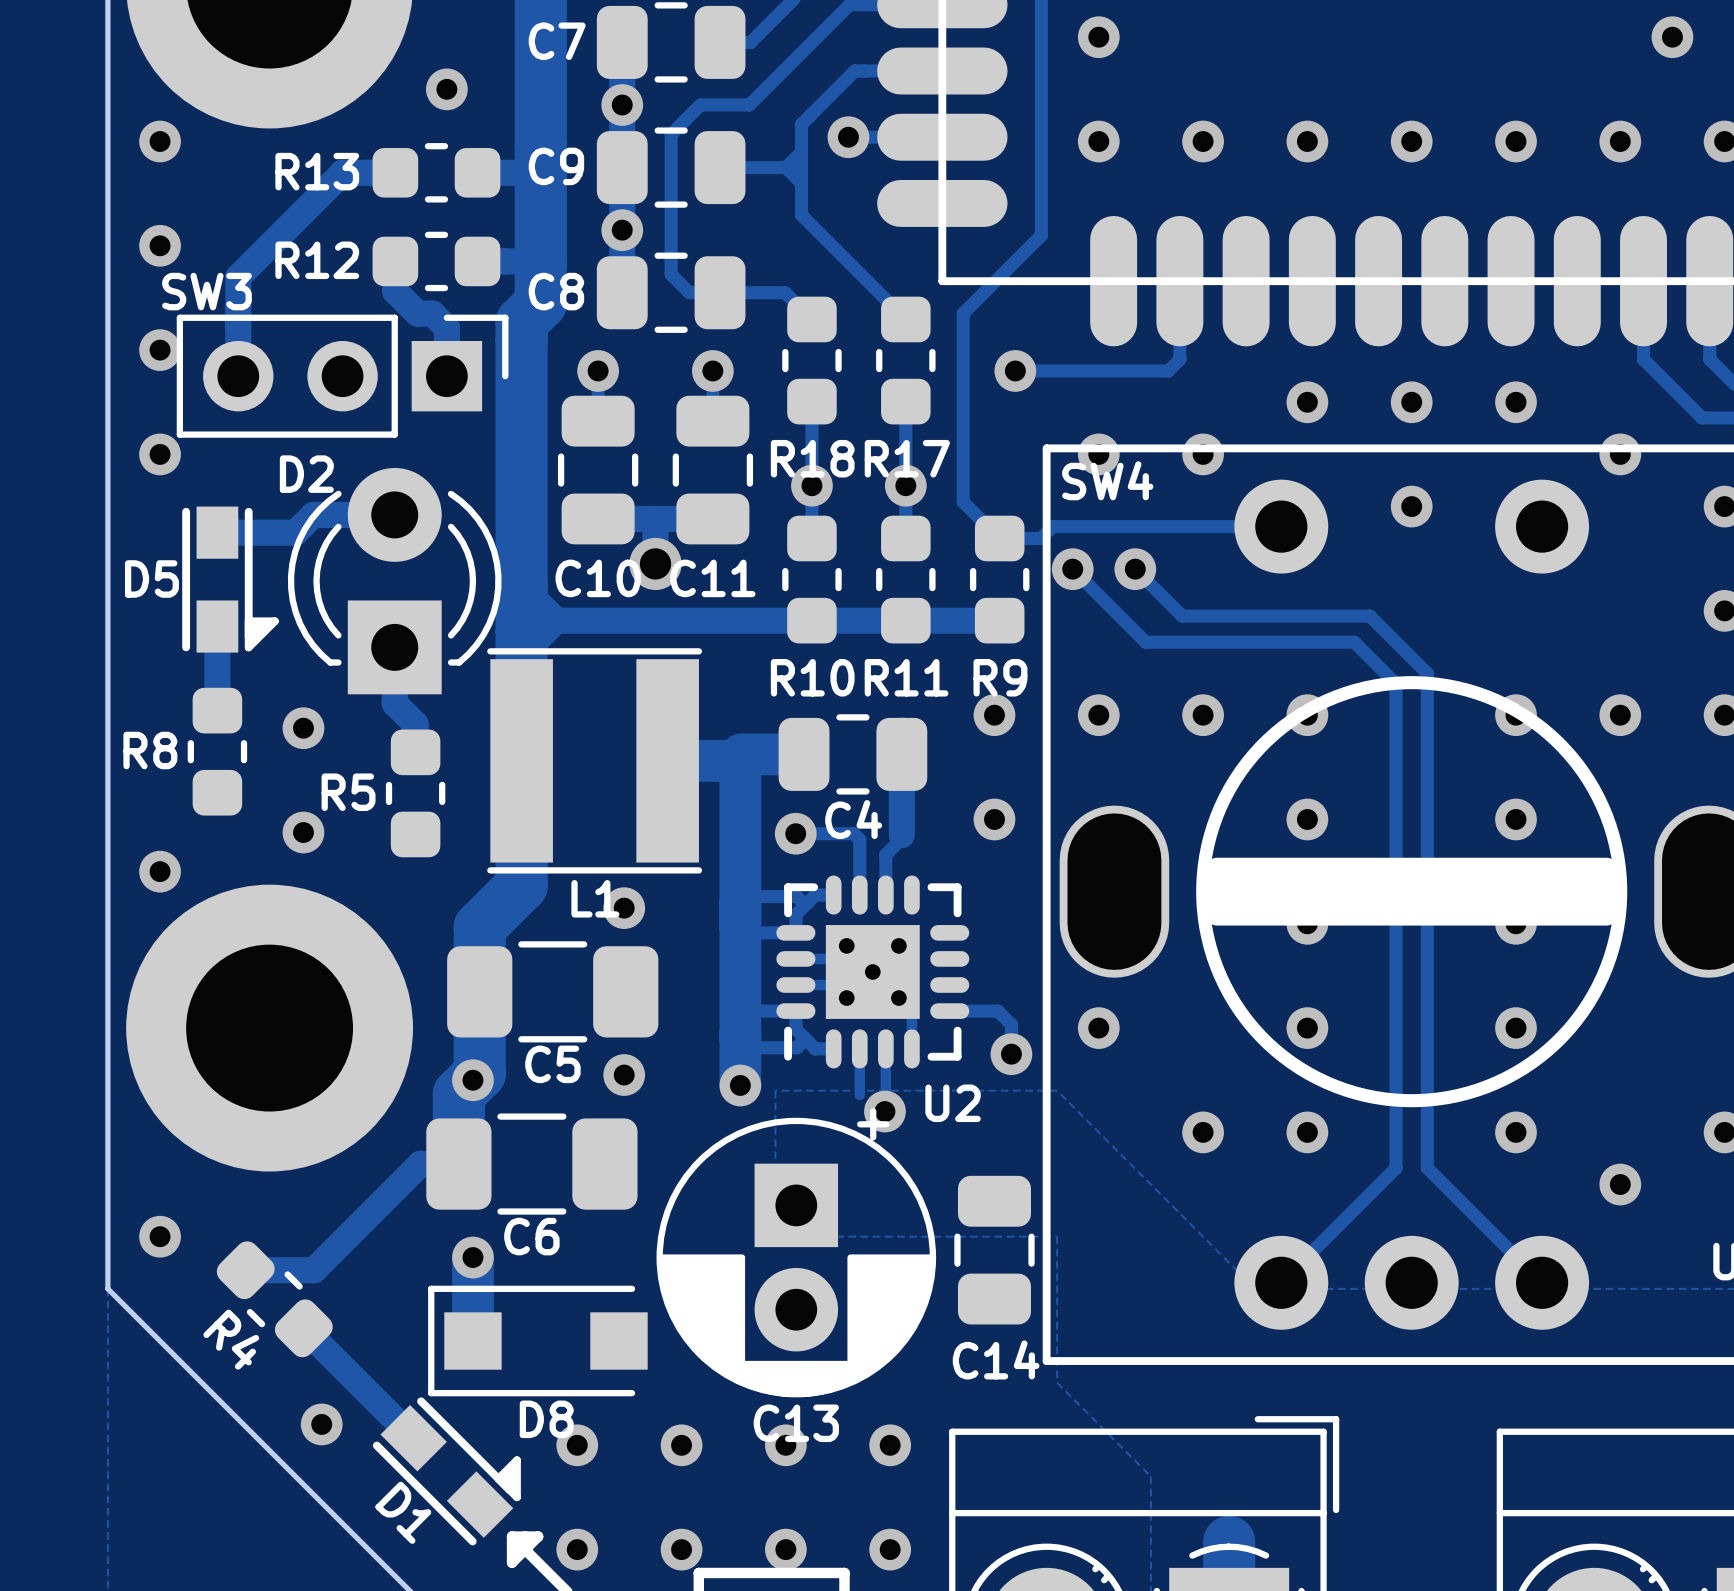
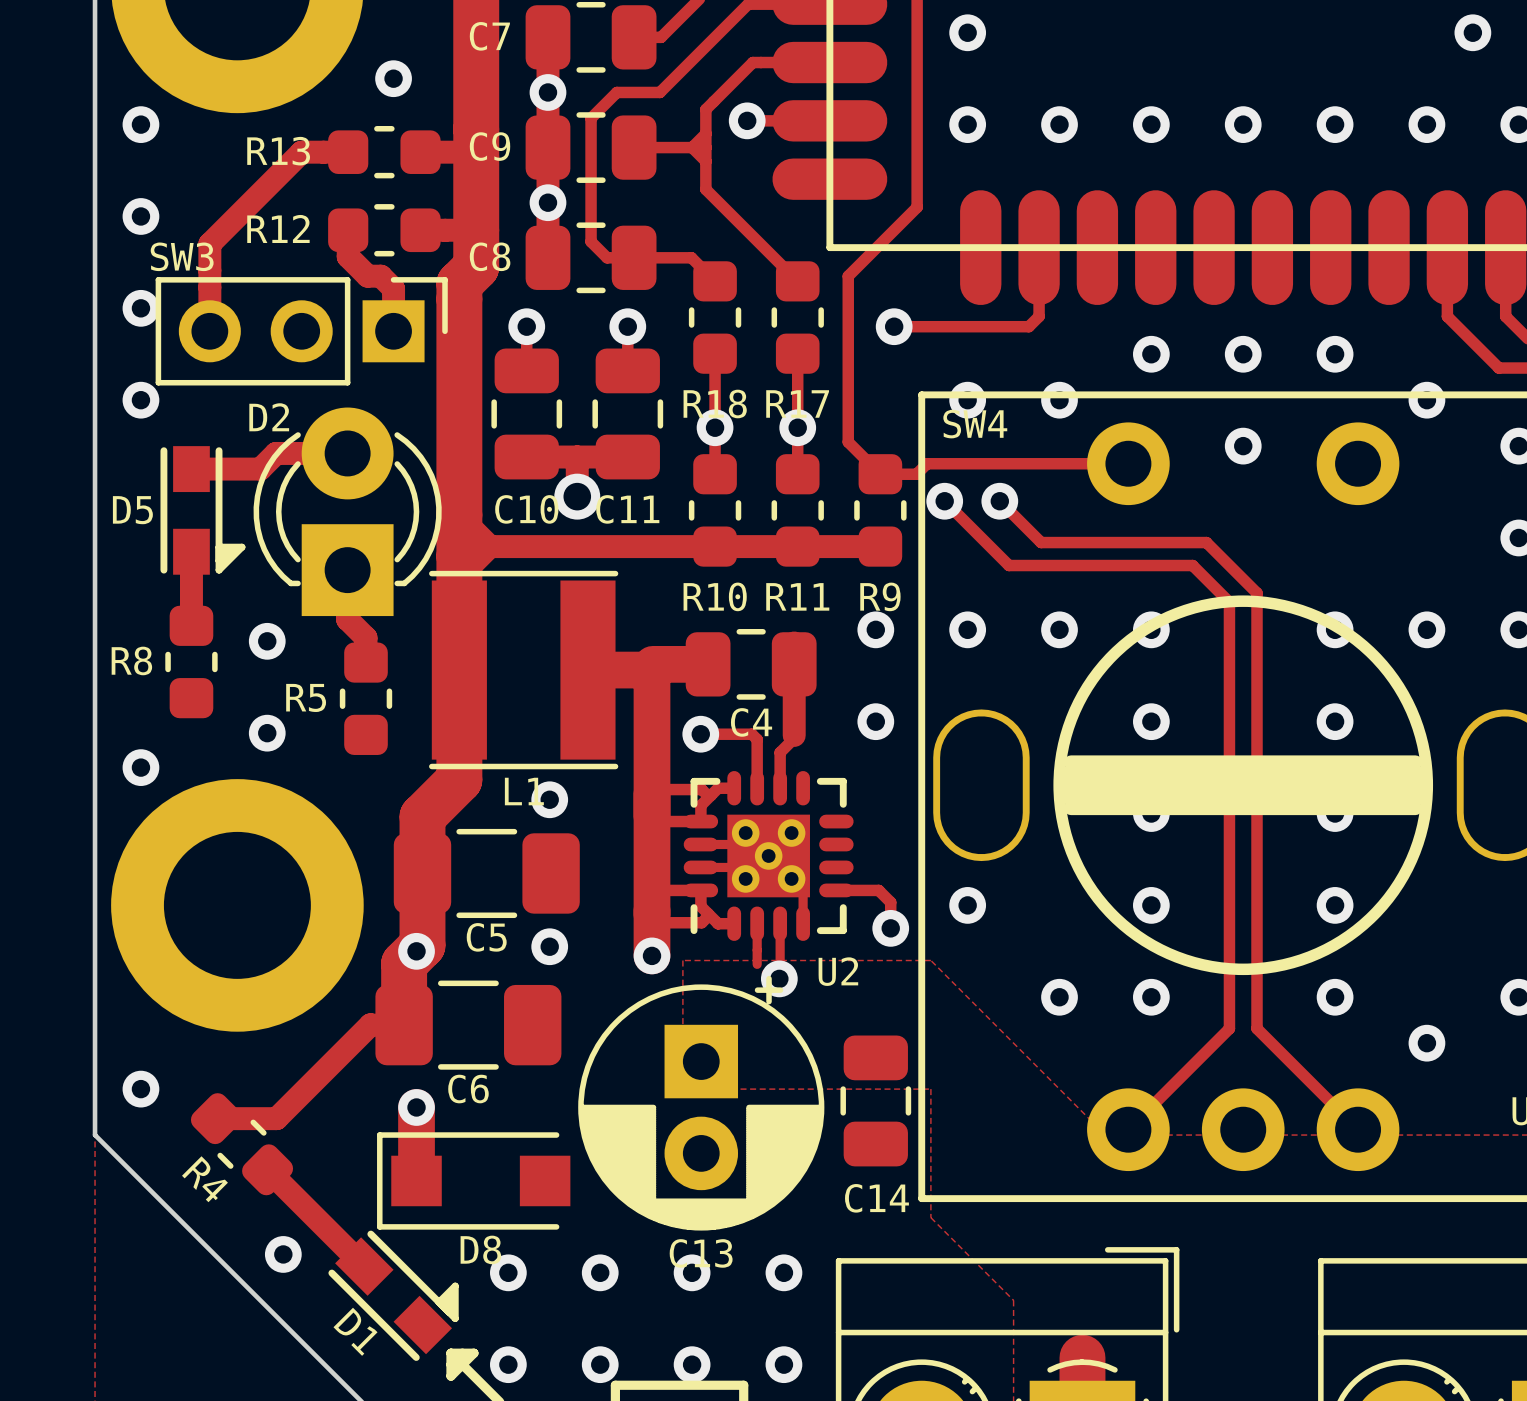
D2 footprint: [287, 467, 502, 695] -> [253, 407, 442, 617]

